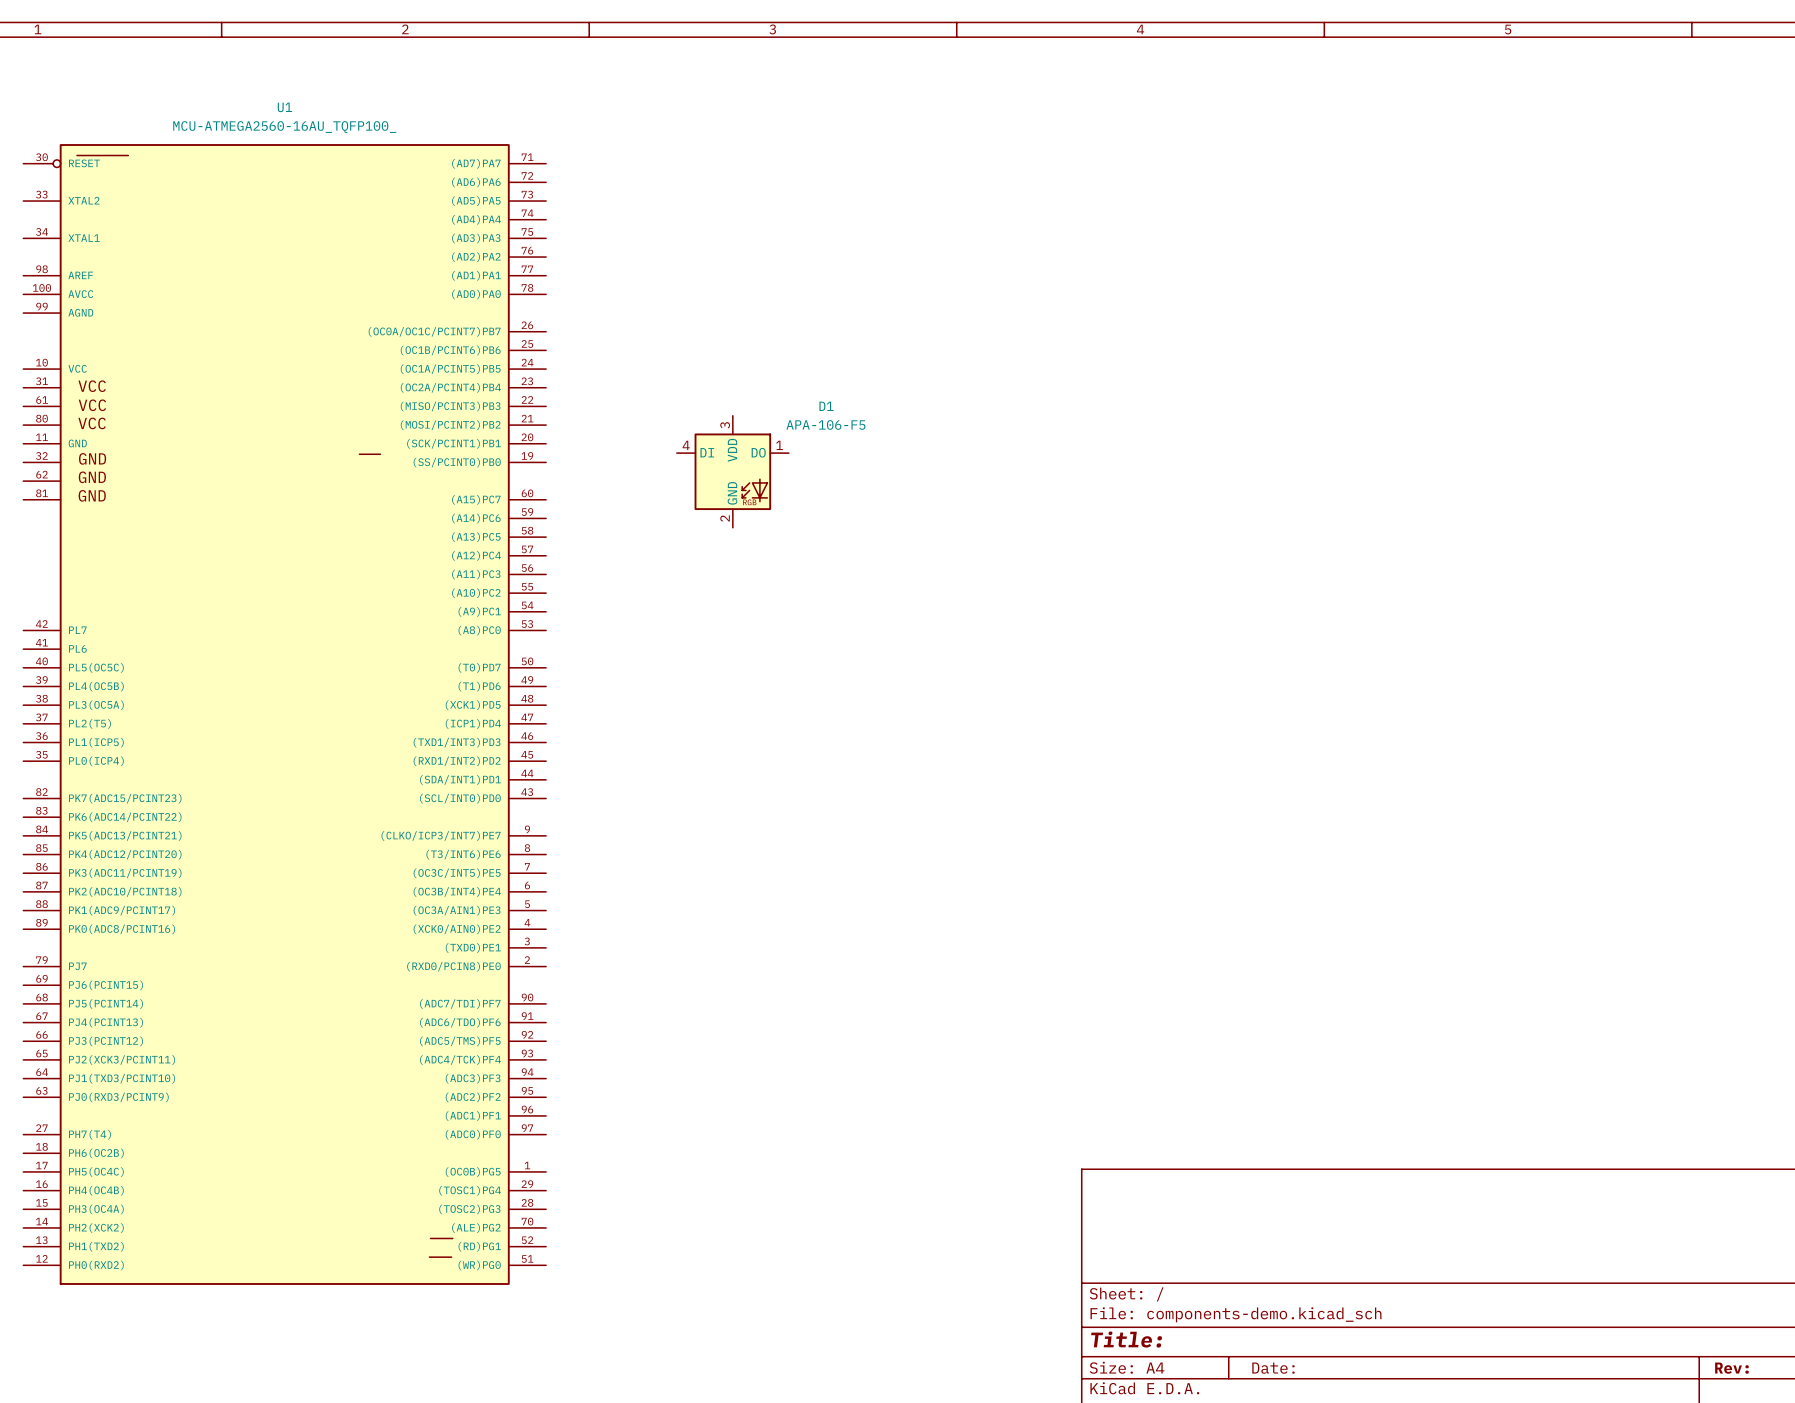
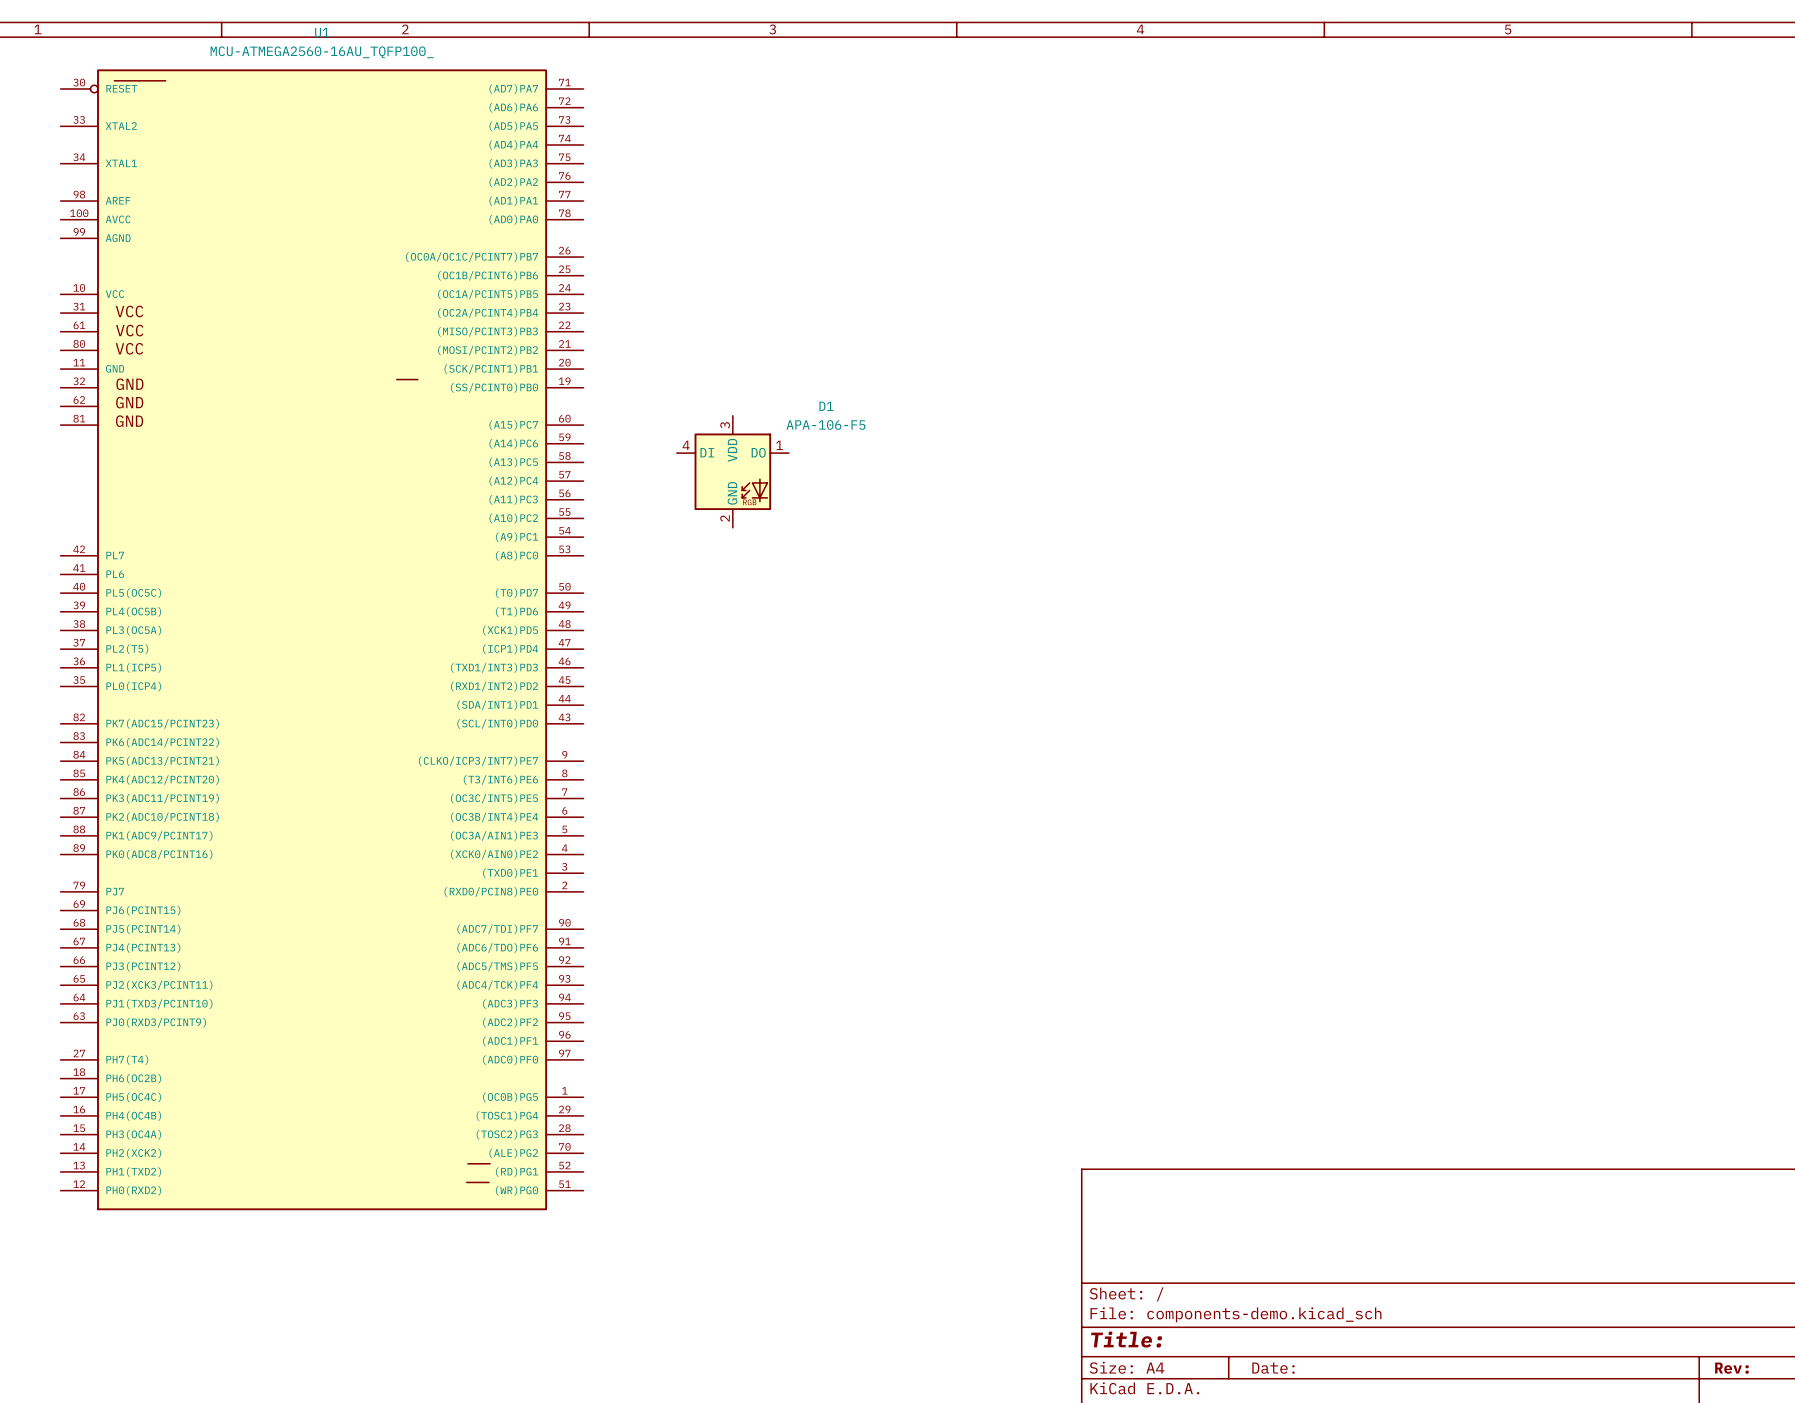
U1 position: (284, 714) -> (322, 639)

